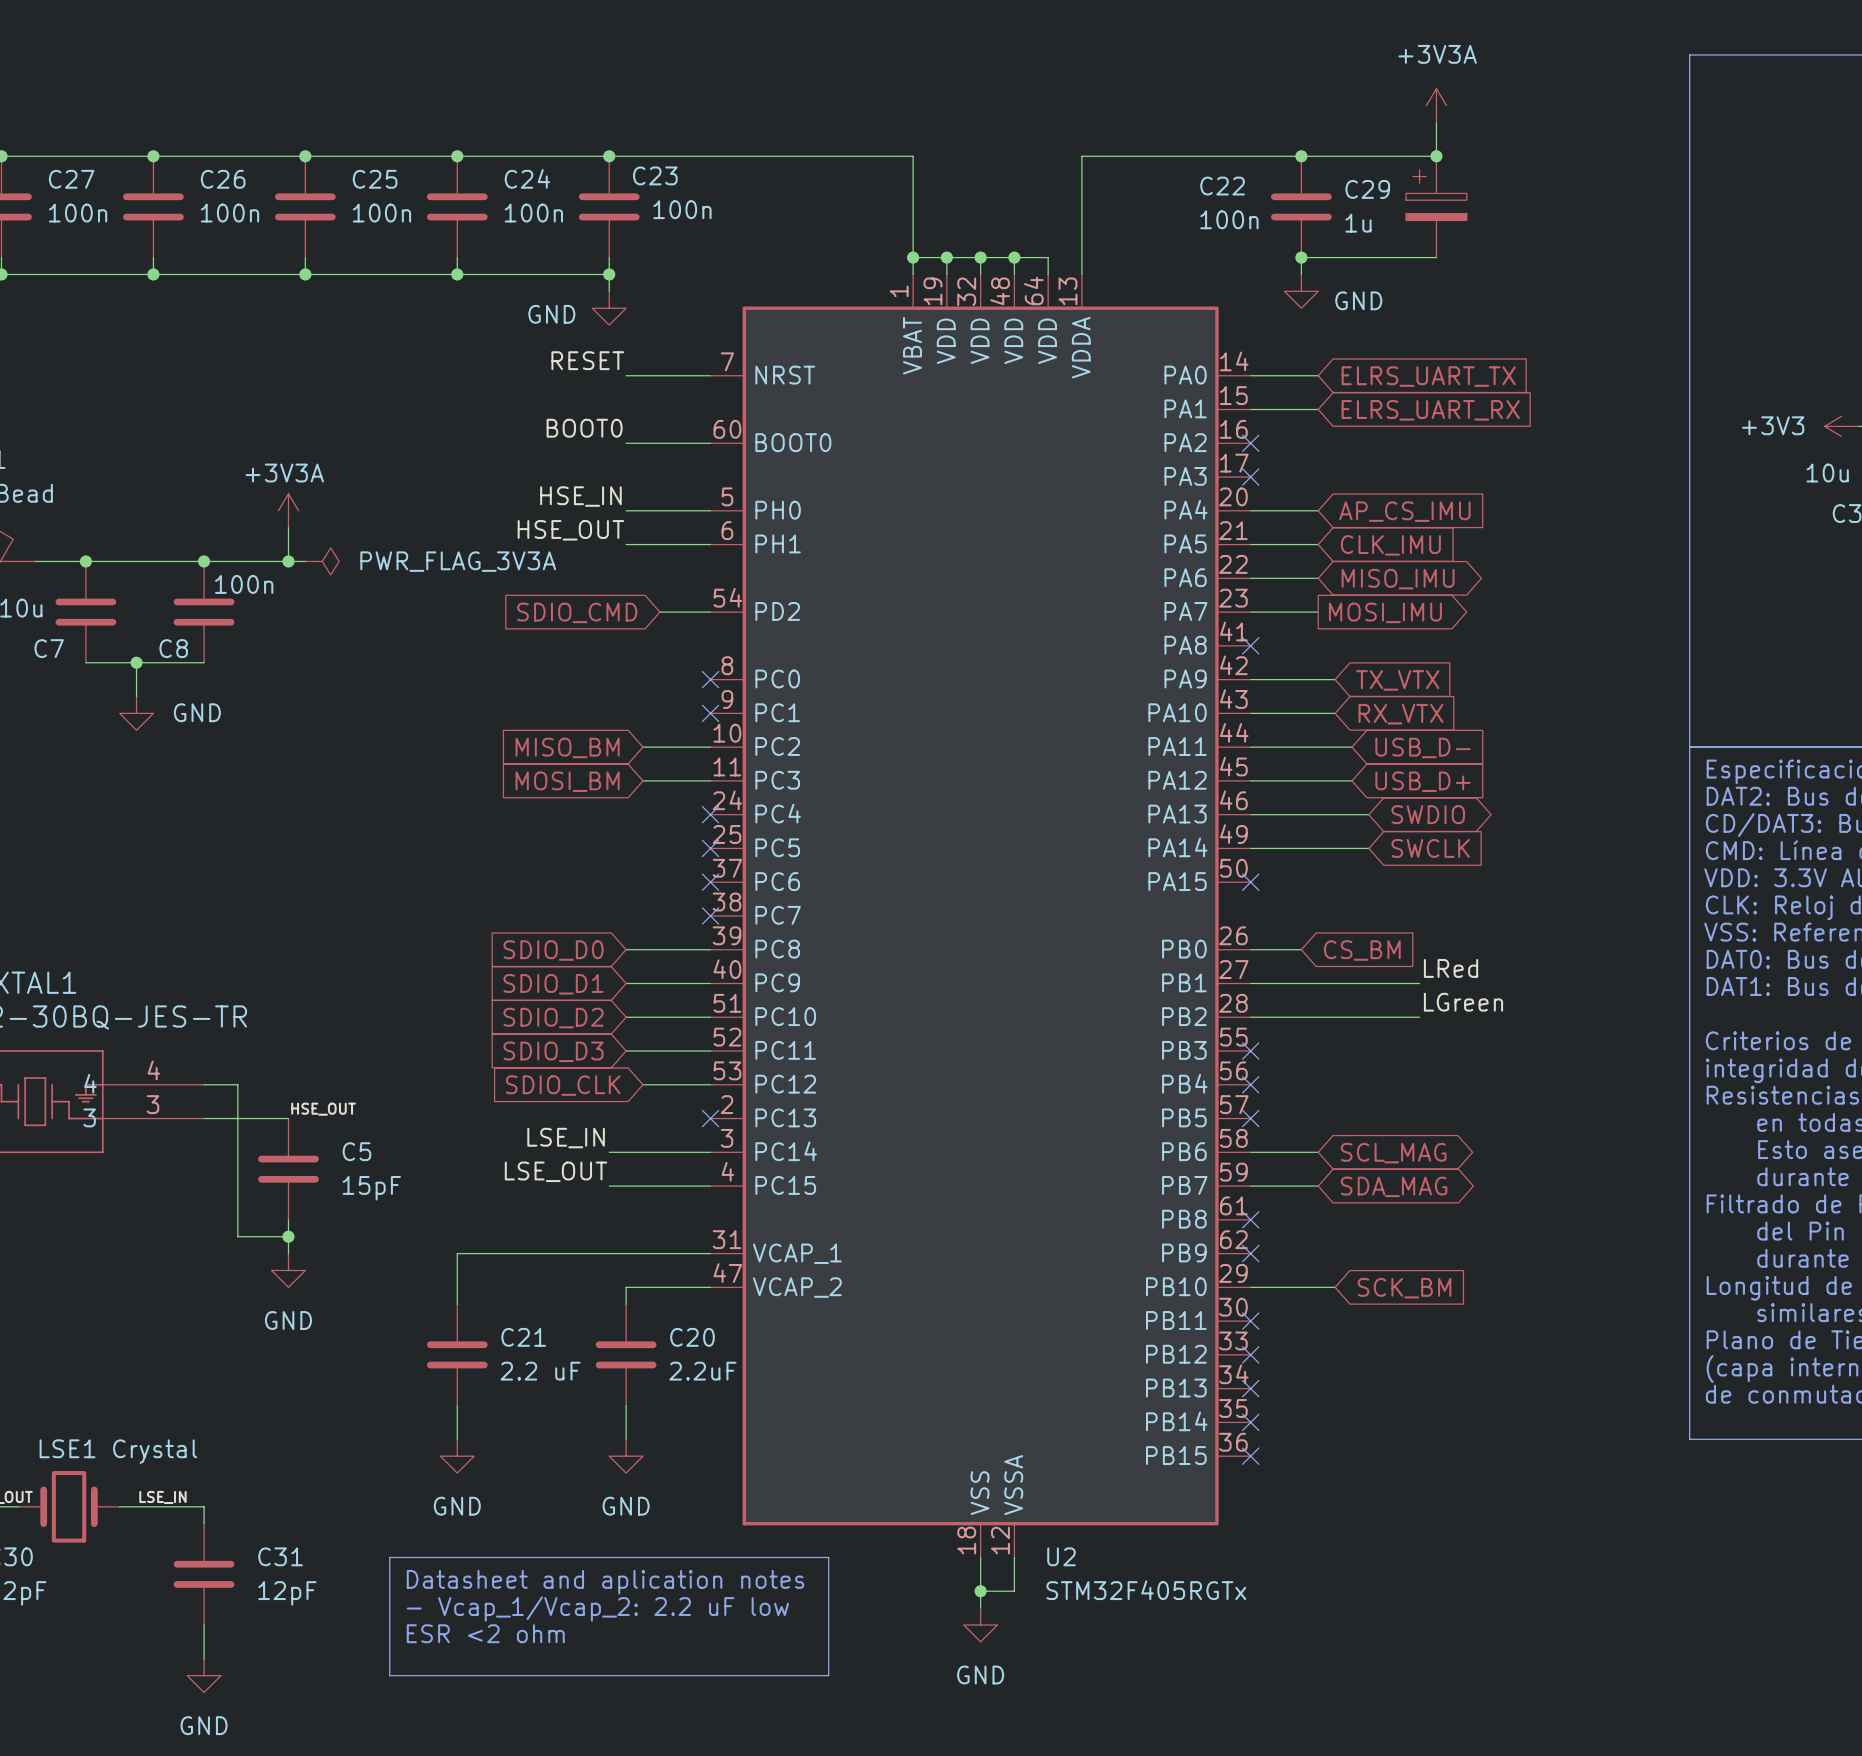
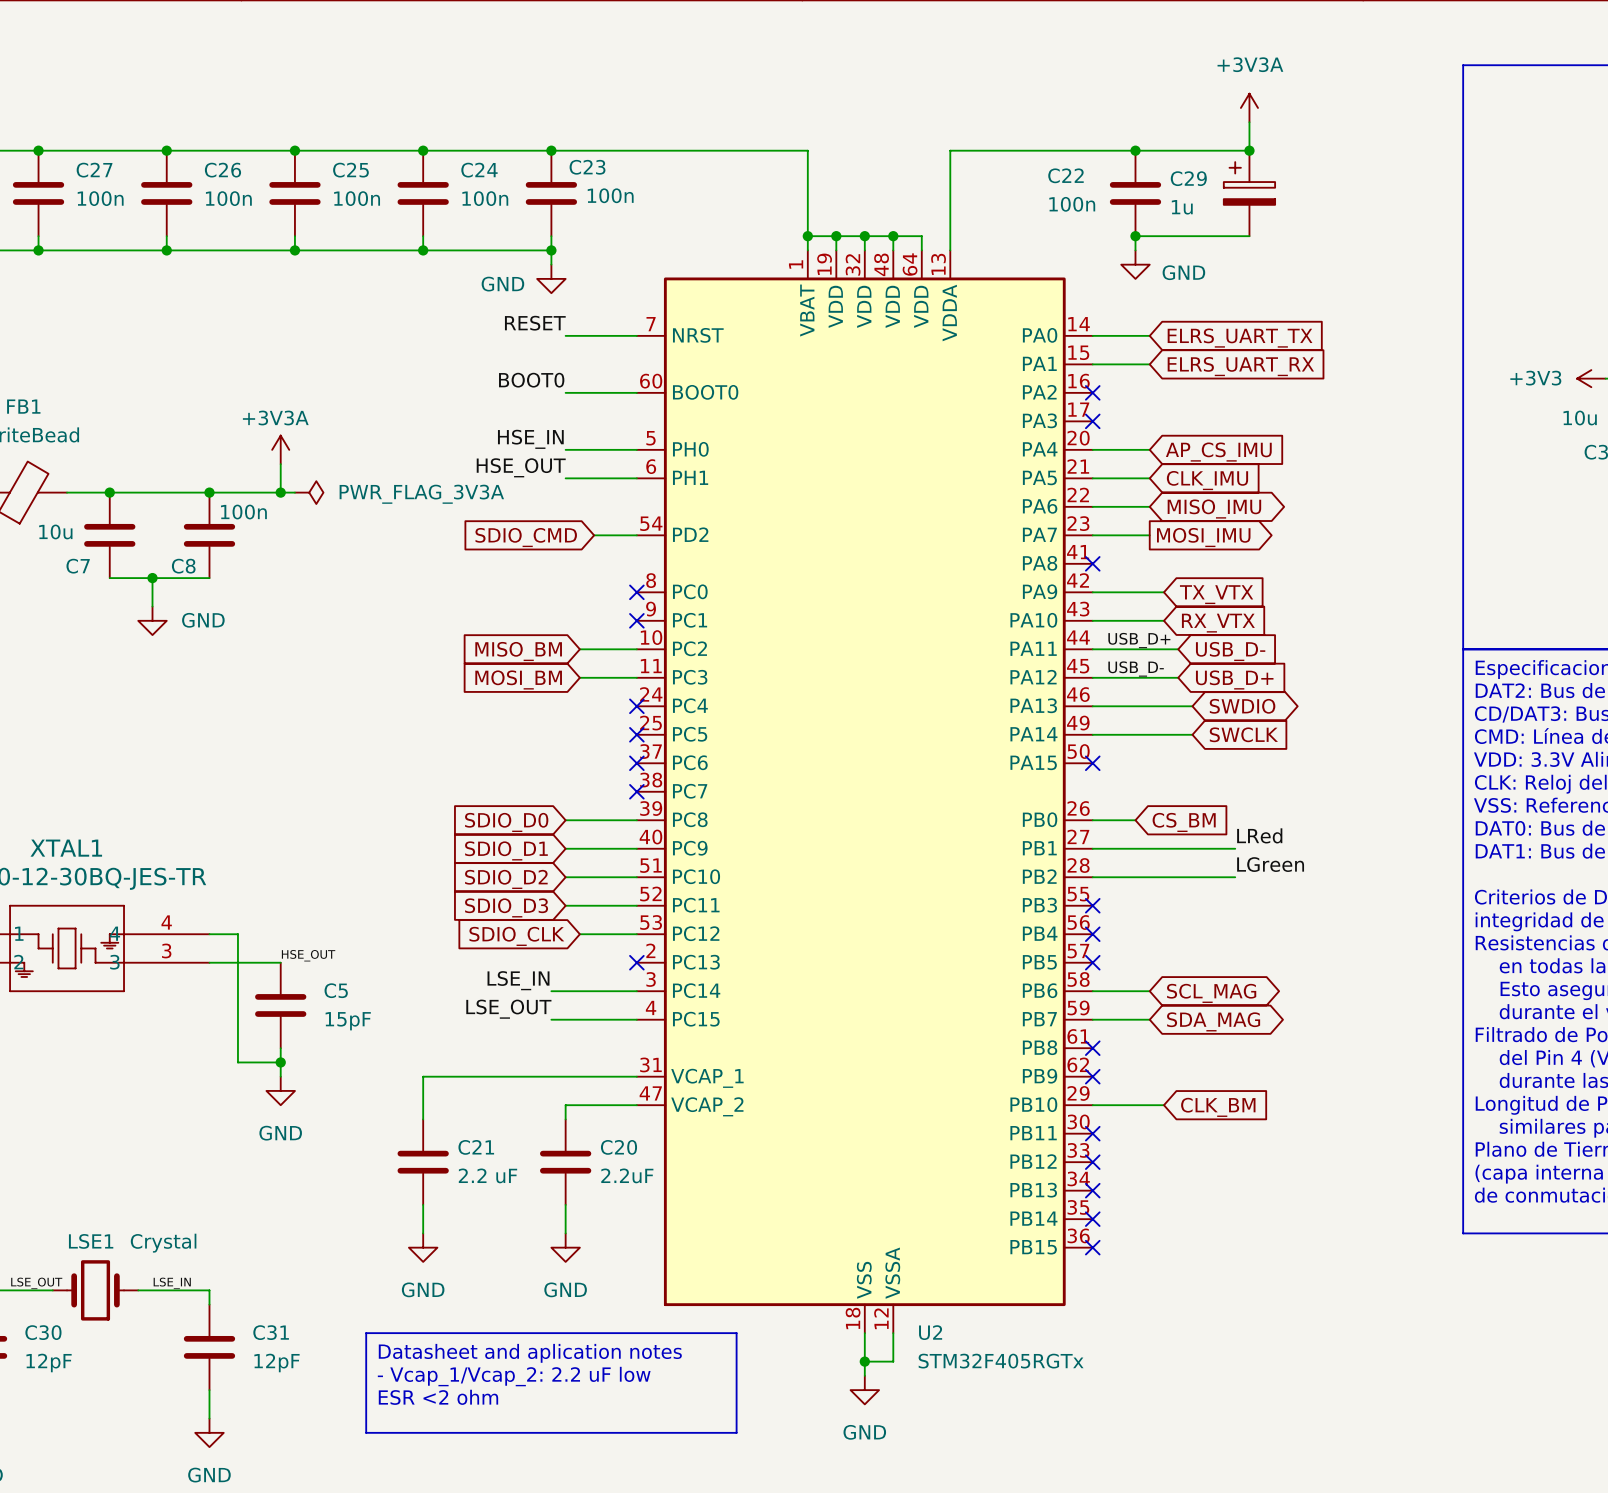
label: none -> USB_D+ (1139, 640)
label: none -> USB_D- (1136, 669)
global label: SCK_BM (1404, 1288) -> CLK_BM (1218, 1107)

